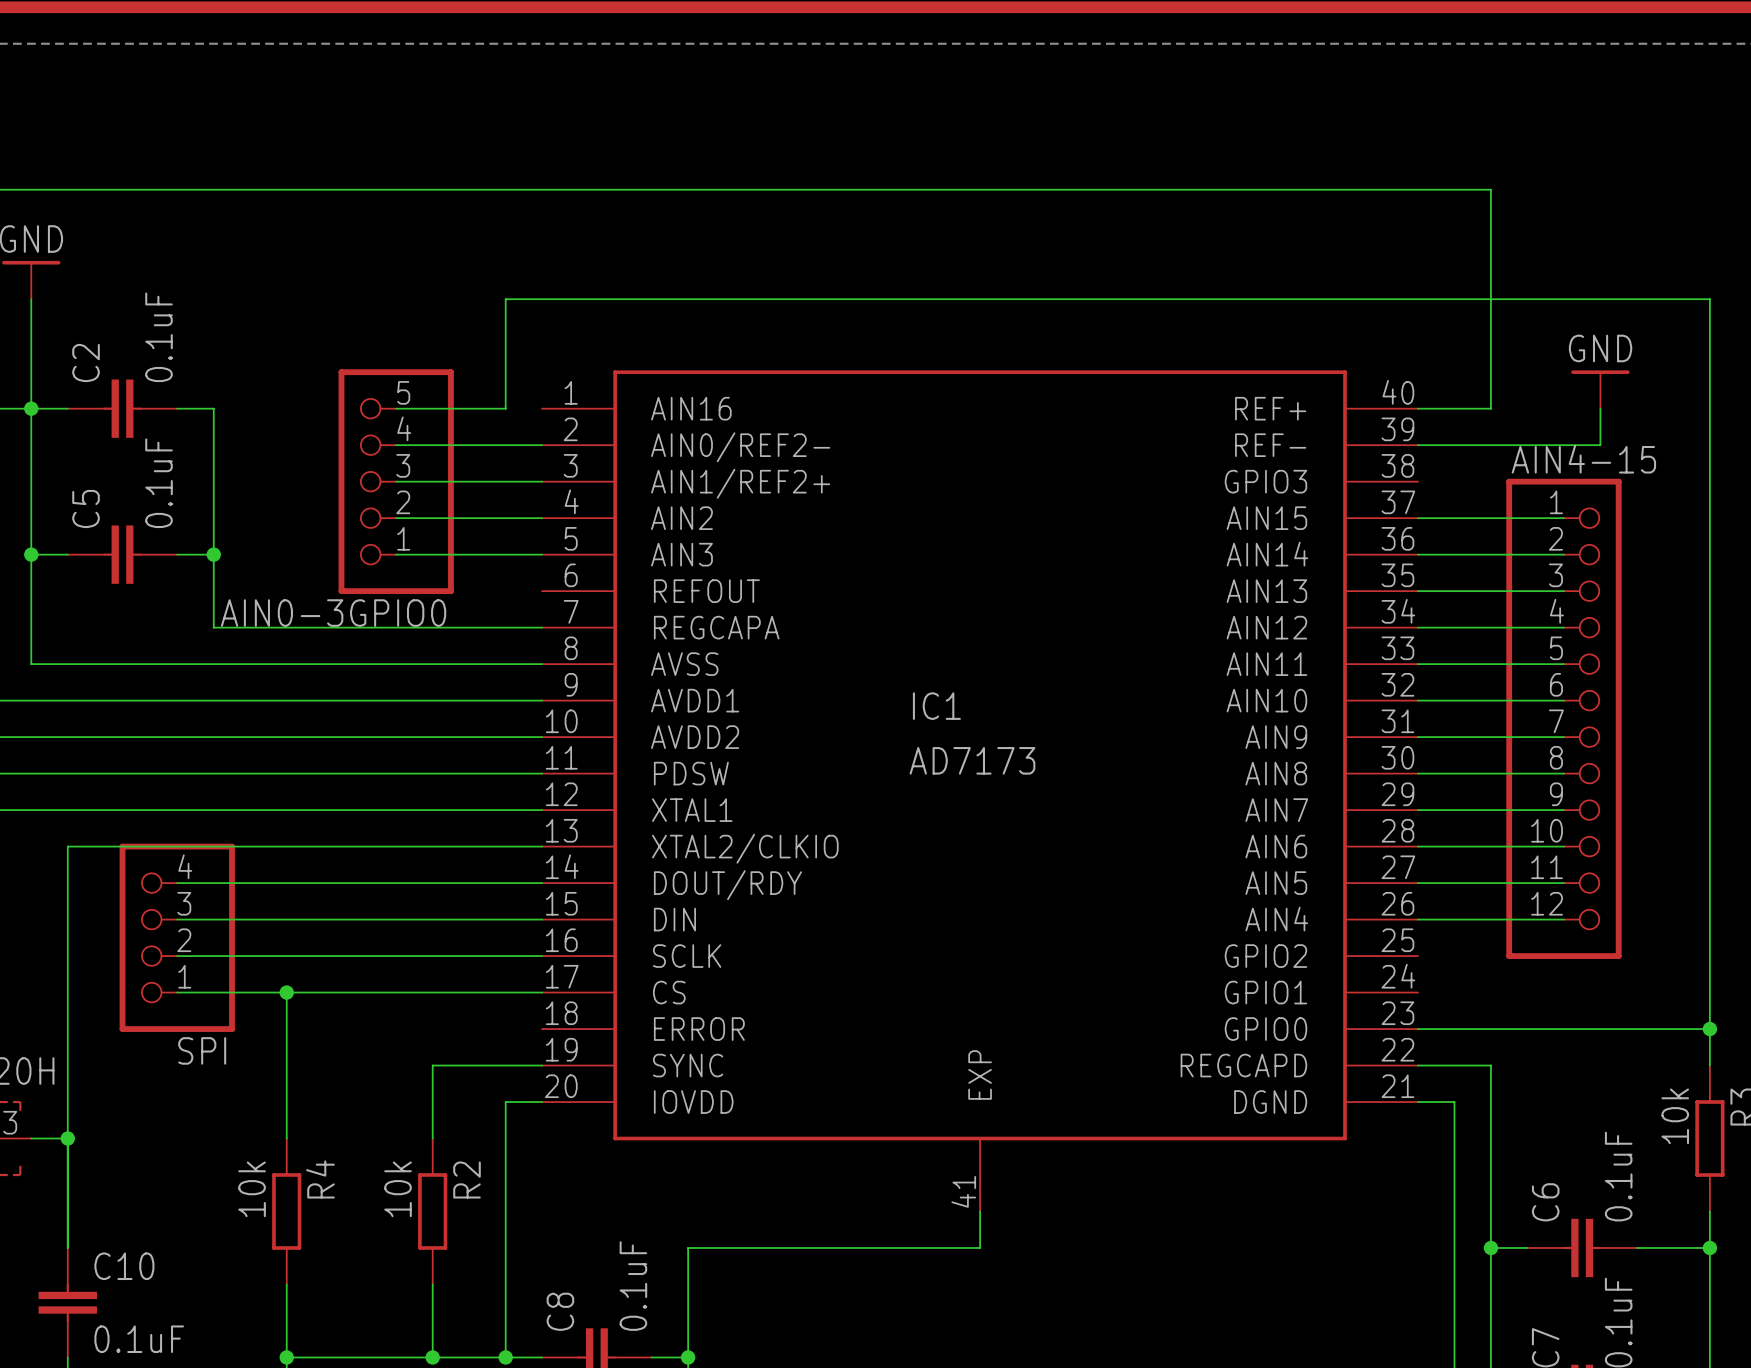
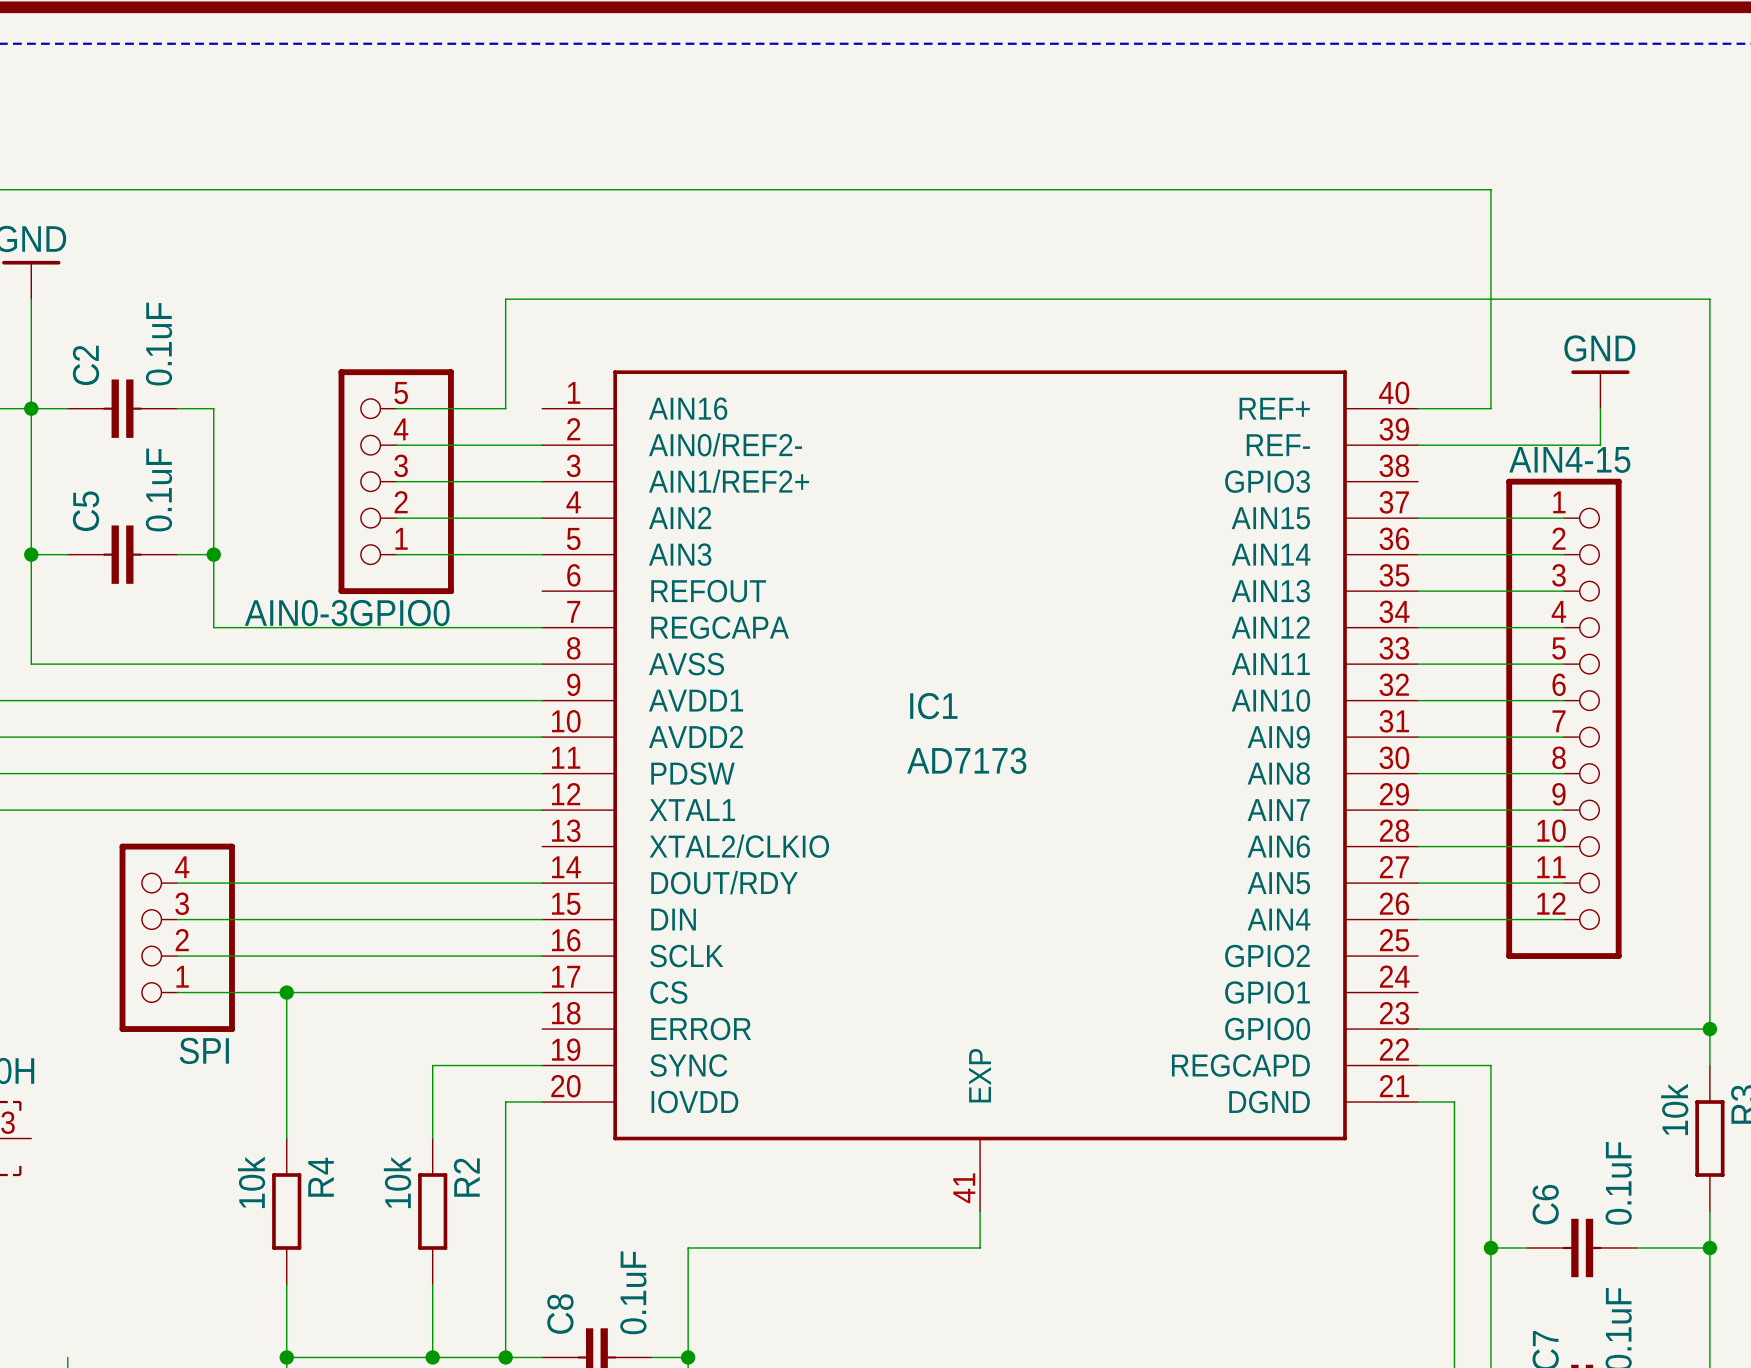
wire: (542, 846) (67, 846) (67, 1247) -> none
wire: (31, 1138) (67, 1138) -> none
junction: (67, 1138) -> none
C10: 0.1uF (67, 1302) -> none

